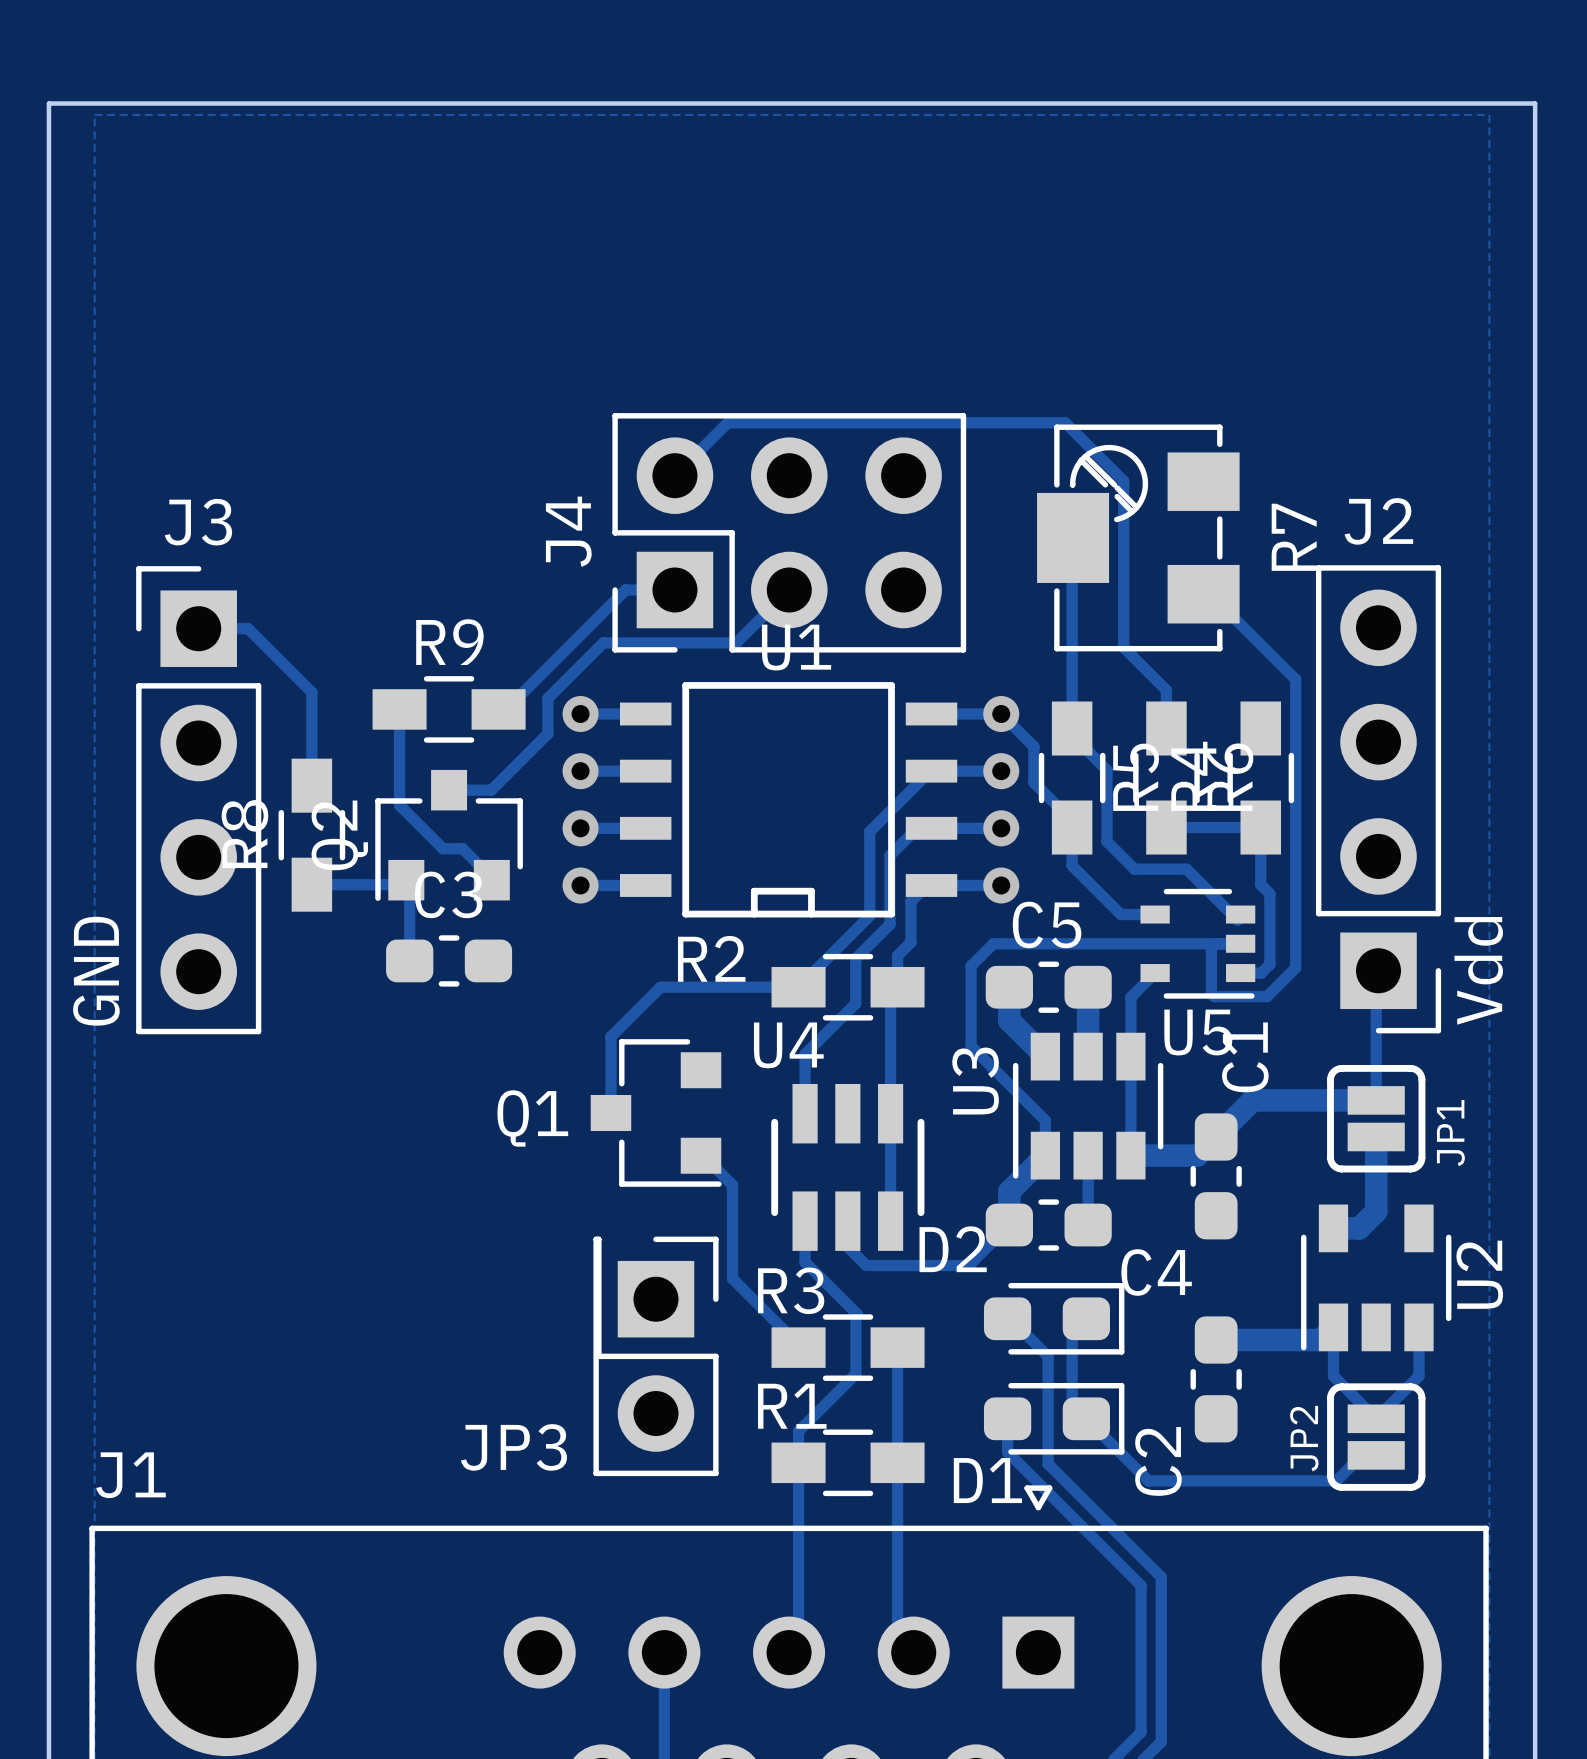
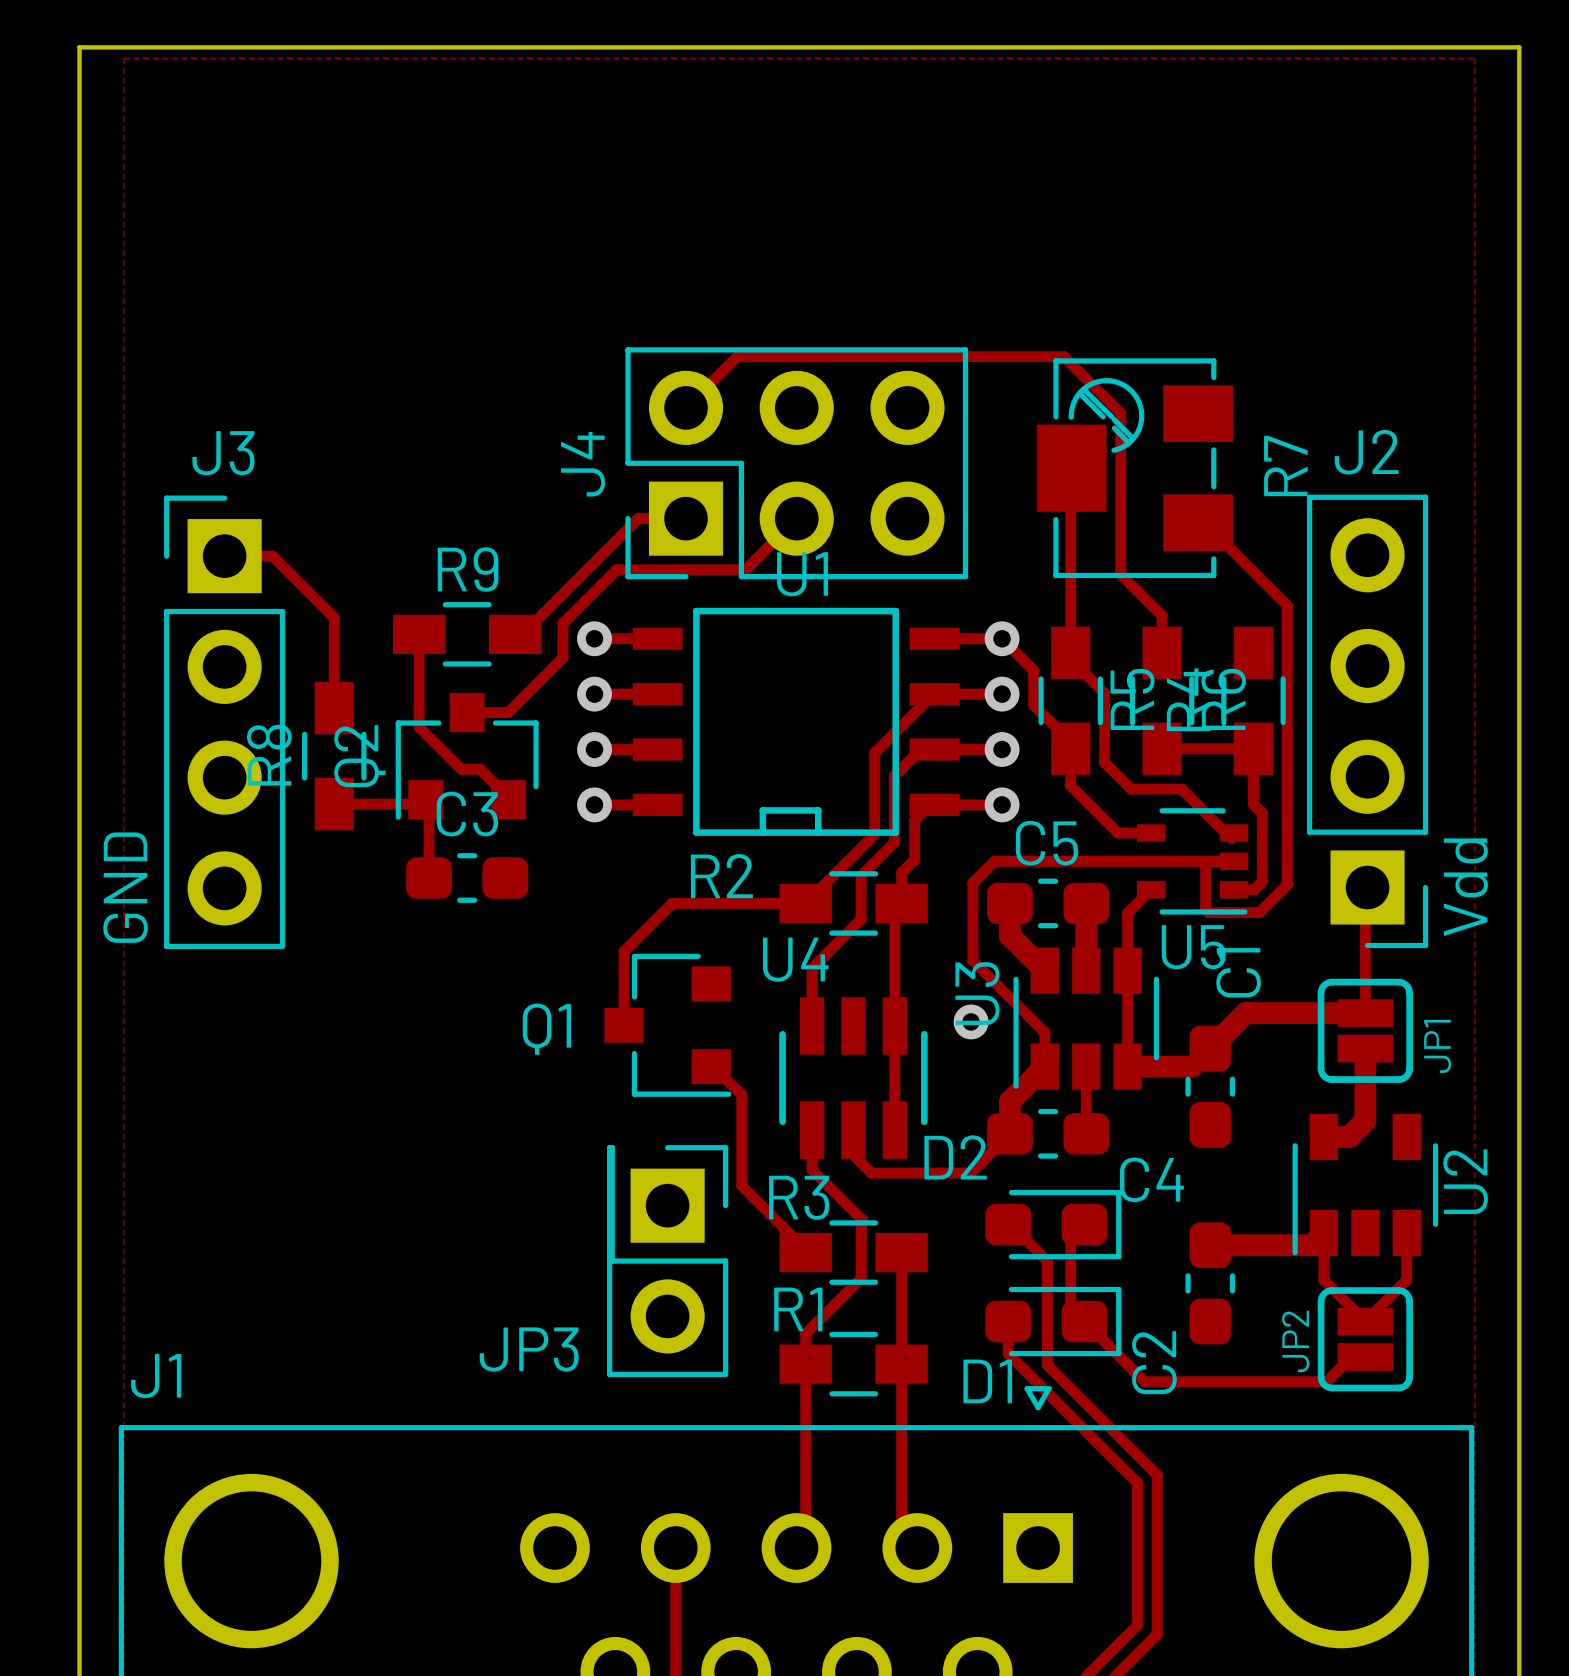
via: none -> (971, 1021)

